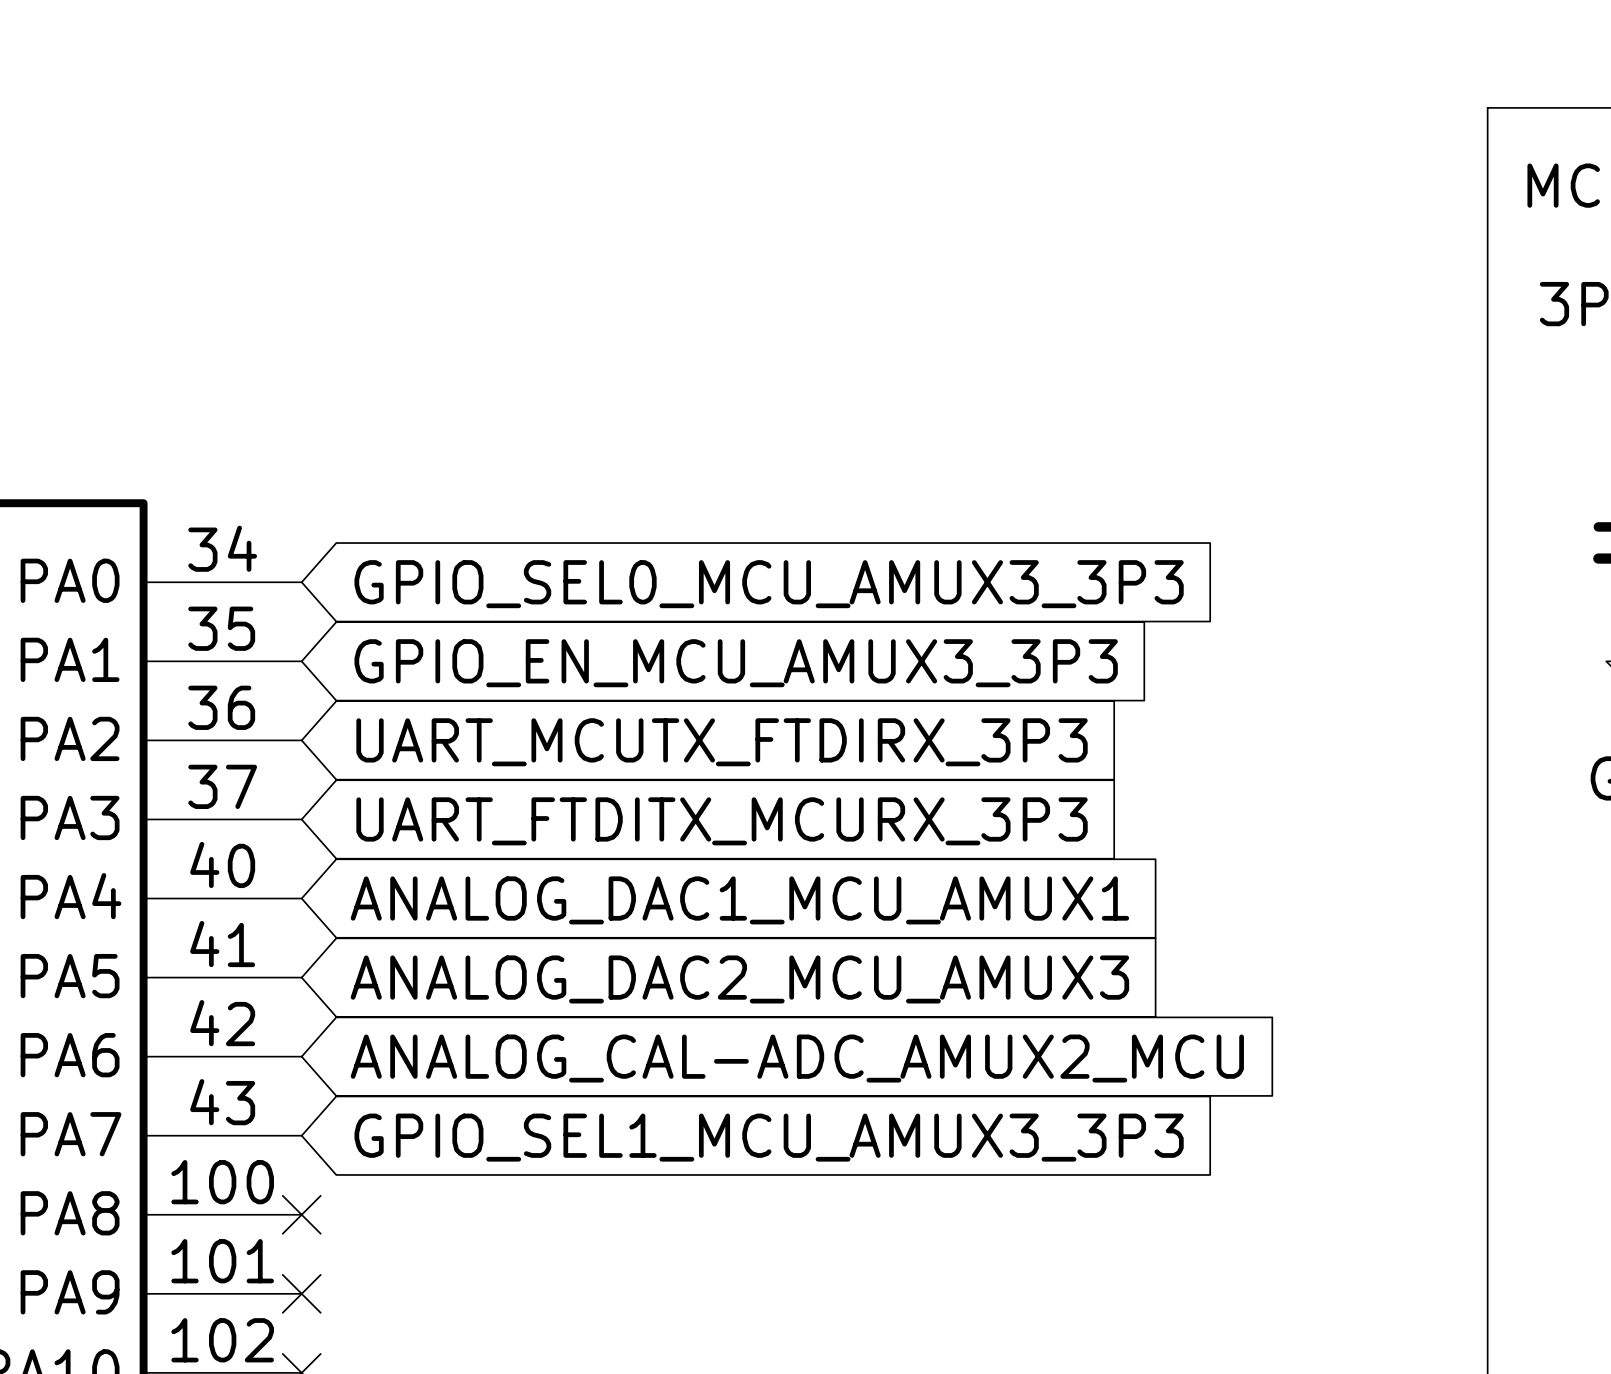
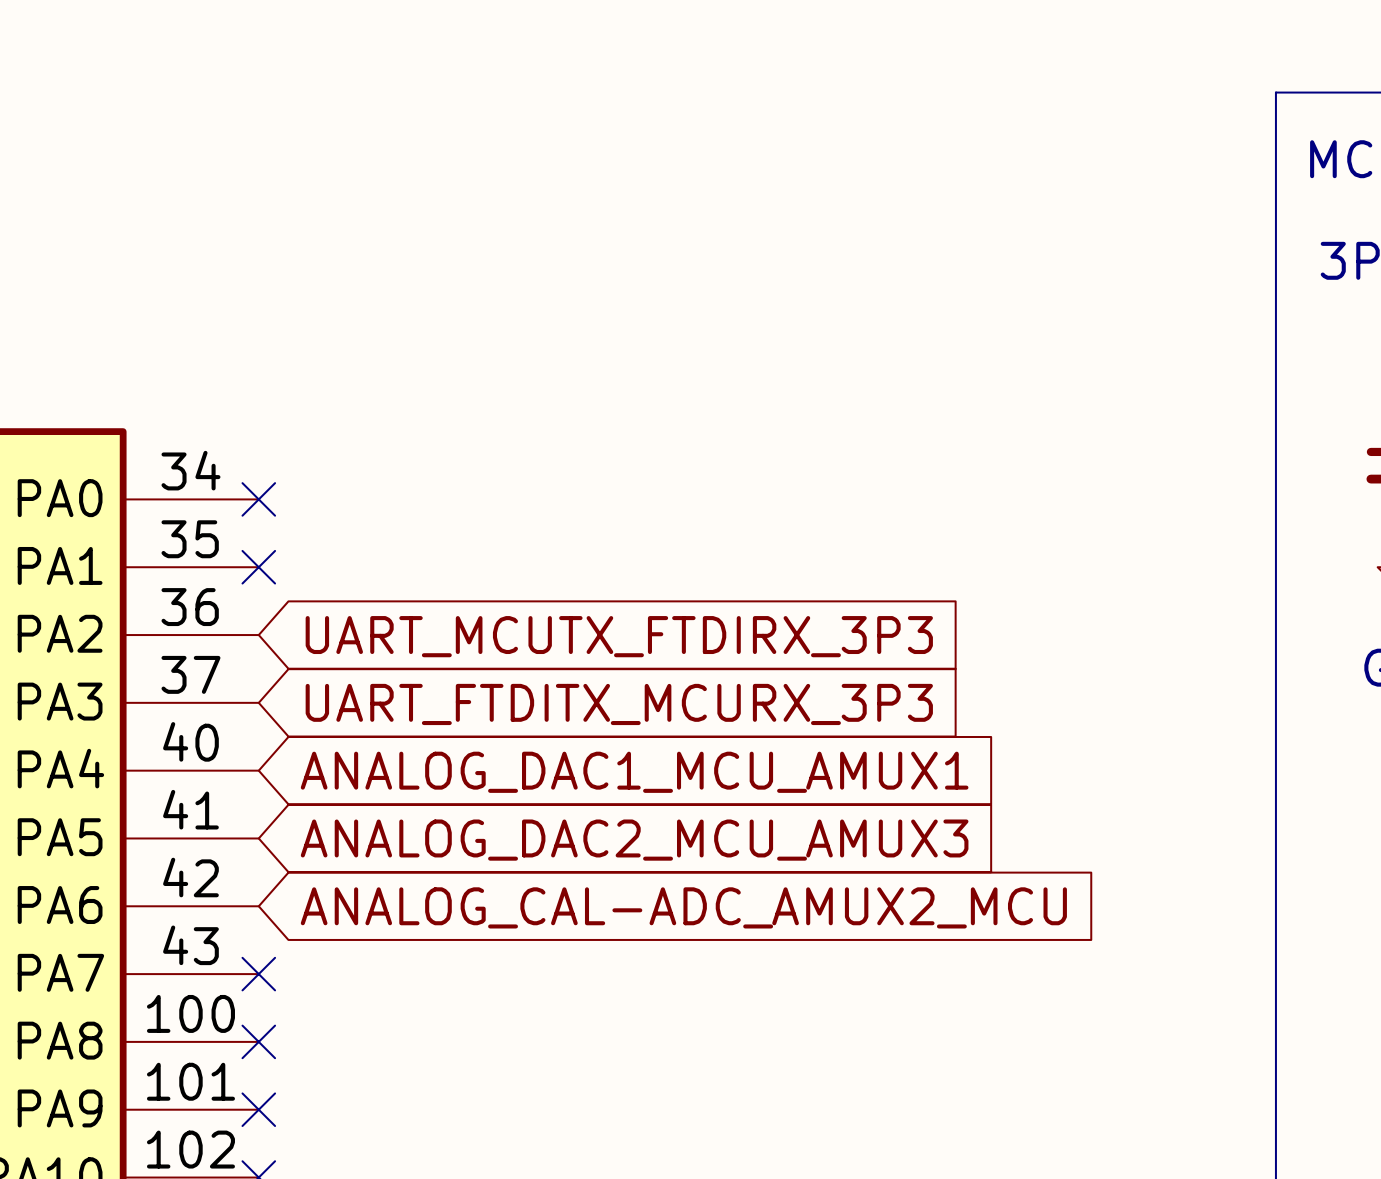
no-connect mark: none -> (258, 499)
global label: GPIO_SEL0_MCU_AMUX3_3P3 (769, 584) -> none
no-connect mark: none -> (258, 567)
global label: GPIO_EN_MCU_AMUX3_3P3 (736, 663) -> none
no-connect mark: none -> (258, 974)
global label: GPIO_SEL1_MCU_AMUX3_3P3 (769, 1137) -> none

